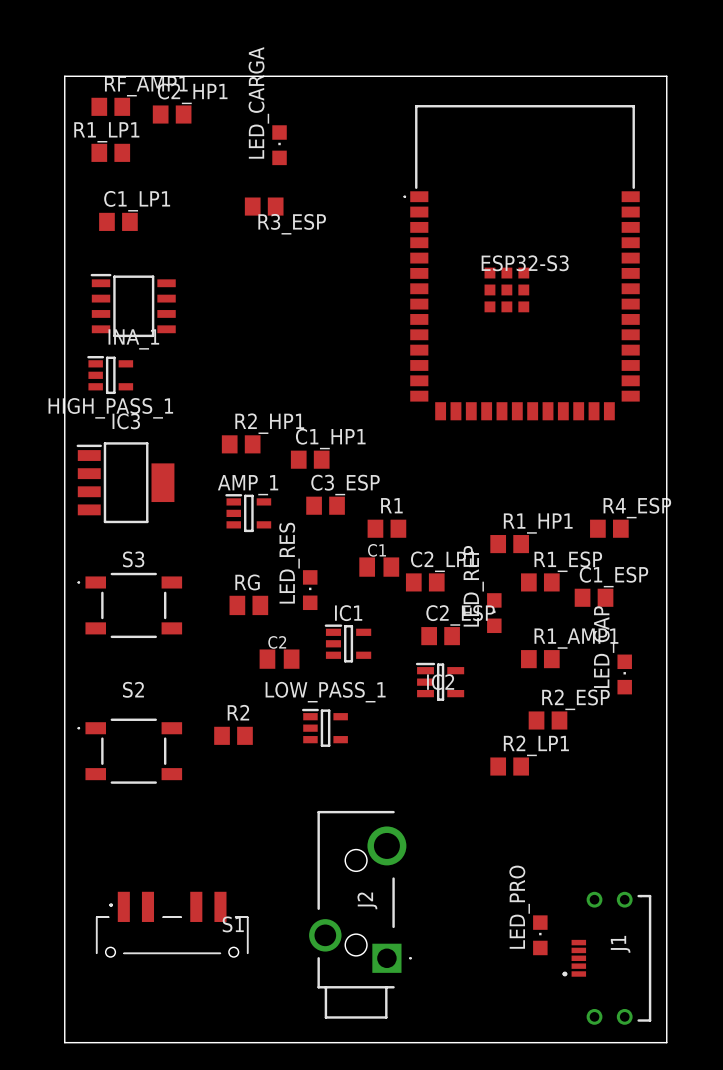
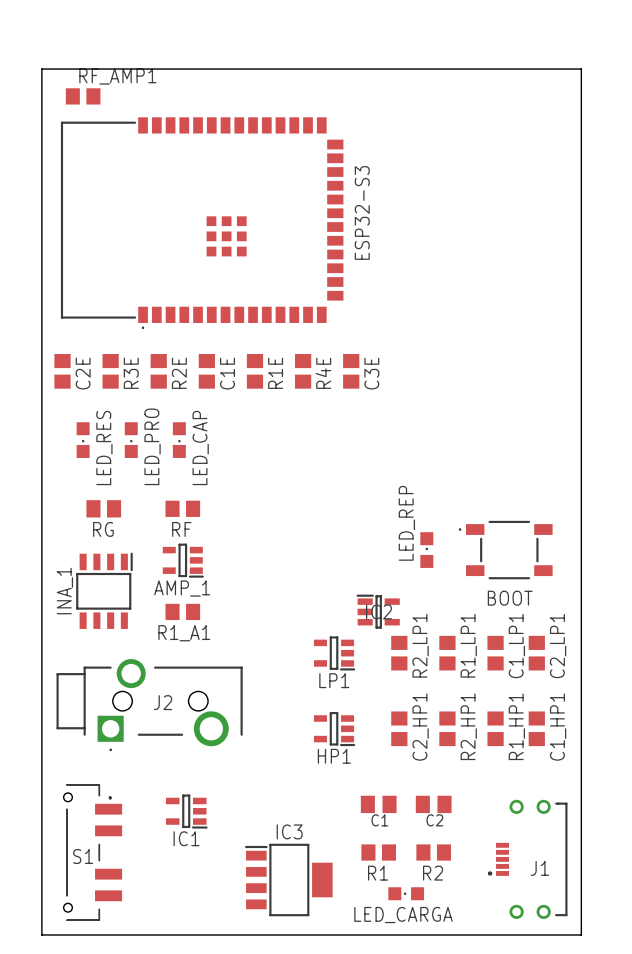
C2_HP1 rotation: 0° (172, 114) -> 90° clockwise (399, 728)
C2_HP1 position: (172, 114) -> (399, 728)
LED_CARGA: (279, 145) -> none
R1_LP1 rotation: 0° (110, 152) -> 90° clockwise (447, 653)
R1_LP1 position: (110, 152) -> (447, 653)
R3_ESP: (264, 206) -> none
C1_LP1 rotation: 0° (118, 221) -> 90° clockwise (495, 653)
C1_LP1 position: (118, 221) -> (495, 653)
ESP32-S3 rotation: 0° (521, 262) -> 90° counterclockwise (202, 223)
ESP32-S3 position: (521, 262) -> (202, 223)
ESP32-S3 name position: ESP32-S3 (525, 263) -> ESP32-S3 (362, 212)
INA_1 rotation: 0° (133, 305) -> 90° clockwise (104, 590)
INA_1 position: (133, 305) -> (104, 590)
HIGH_PASS_1: (110, 375) -> none
C2E: none -> (62, 371)
R3E: none -> (110, 371)
R2E: none -> (158, 371)
C1E: none -> (206, 371)
R1E: none -> (254, 371)
R4E: none -> (303, 371)
C3E: none -> (351, 371)
IC3 name position: IC3 (126, 421) -> IC3 (289, 831)
R2_HP1 rotation: 0° (241, 444) -> 90° clockwise (447, 728)
R2_HP1 position: (241, 444) -> (447, 728)
C1_HP1 rotation: 0° (310, 459) -> 90° clockwise (536, 728)
C1_HP1 position: (310, 459) -> (536, 728)
IC3 position: (125, 482) -> (288, 880)
LED_PRO: none -> (131, 440)
LED_CAP: none -> (179, 440)
C3_ESP: (325, 505) -> none
R1 name position: R1 (391, 505) -> R1 (378, 873)
AMP_1 rotation: 0° (248, 513) -> 180° (183, 560)
AMP_1 position: (248, 513) -> (183, 560)
R1 position: (386, 528) -> (378, 852)
R4_ESP: (609, 528) -> none
R1_HP1 rotation: 0° (509, 544) -> 90° clockwise (495, 728)
R1_HP1 position: (509, 544) -> (495, 728)
C1 name position: C1 (377, 550) -> C1 (379, 820)
LED_RES name position: LED_RES (289, 563) -> LED_RES (104, 448)
RF: none -> (182, 508)
C1 position: (379, 567) -> (378, 804)
RG name position: RG (247, 582) -> RG (103, 529)
C2_LP1 rotation: 0° (425, 582) -> 90° clockwise (536, 653)
C2_LP1 position: (425, 582) -> (536, 653)
R1_ESP: (540, 582) -> none
LED_RES rotation: 0° (310, 590) -> 180° (83, 440)
LED_RES position: (310, 590) -> (83, 440)
C1_ESP: (594, 597) -> none
S3: (129, 605) -> none
RG position: (248, 605) -> (103, 508)
BOOT: none -> (505, 550)
C2_ESP: (440, 636) -> none
C2 name position: C2 (277, 642) -> C2 (434, 820)
IC1 rotation: 0° (347, 643) -> 180° (186, 811)
IC1 position: (347, 643) -> (186, 811)
C2 position: (279, 659) -> (433, 804)
R1_AMP1: (540, 659) -> none
LED_CAP: (624, 674) -> none
R1_A1: none -> (182, 611)
R2 name position: R2 (238, 712) -> R2 (433, 873)
R2_ESP: (548, 720) -> none
LOW_PASS_1: (324, 727) -> none
LP1: none -> (334, 653)
R2 position: (233, 735) -> (433, 852)
S2: (129, 751) -> none
R2_LP1 rotation: 0° (509, 766) -> 90° clockwise (399, 653)
R2_LP1 position: (509, 766) -> (399, 653)
HP1: none -> (334, 729)
J2 rotation: 0° (360, 914) -> 90° clockwise (149, 705)
J2 position: (360, 914) -> (149, 705)
S1 rotation: 0° (172, 924) -> 90° clockwise (92, 852)
S1 name position: S1 (233, 924) -> S1 (83, 856)
LED_PRO: (540, 935) -> none
J1 name rotation: 0° (620, 944) -> 90° clockwise (539, 868)
LED_CARGA: none -> (406, 893)

